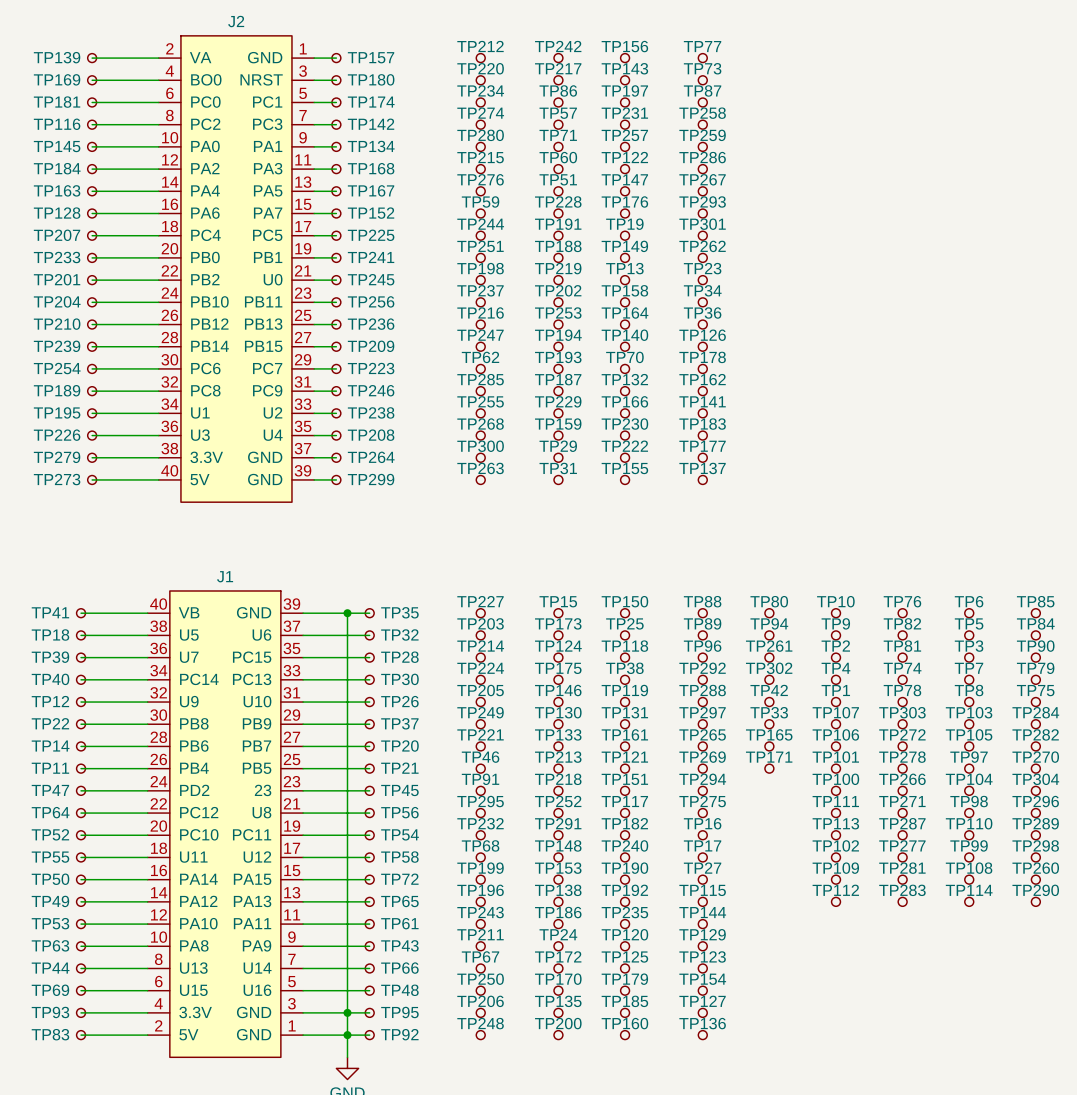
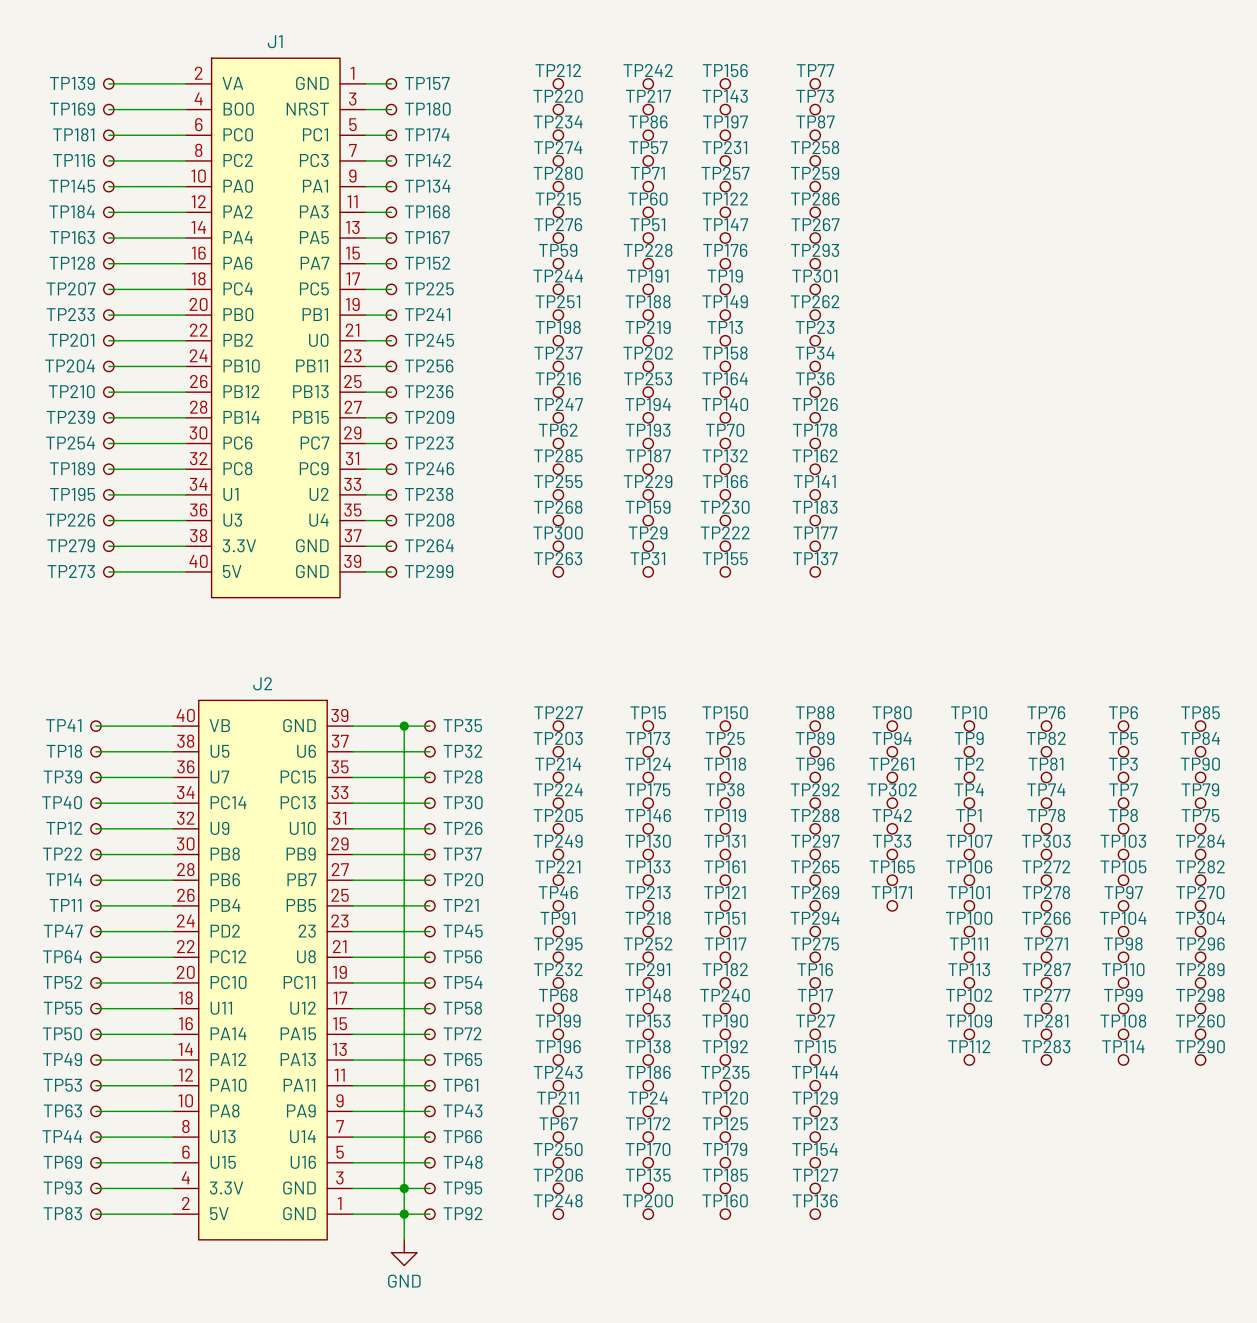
J2 name: J2 (236, 21) -> J1 (275, 41)
J1 name: J1 (225, 576) -> J2 (262, 683)

